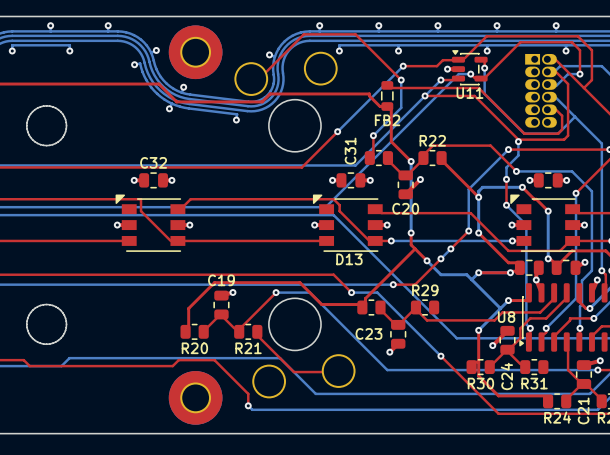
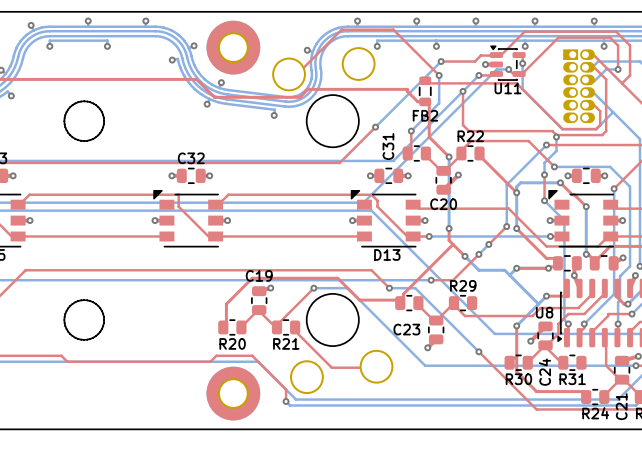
top track: (425, 95) (474, 95) (514, 135) -> (463, 91) (463, 125) (468, 131) (552, 131)
bottom track: (61, 366) (69, 358) (280, 358) (315, 393) (589, 393) -> (99, 361) (258, 361) (296, 399) (618, 399) (628, 389)

